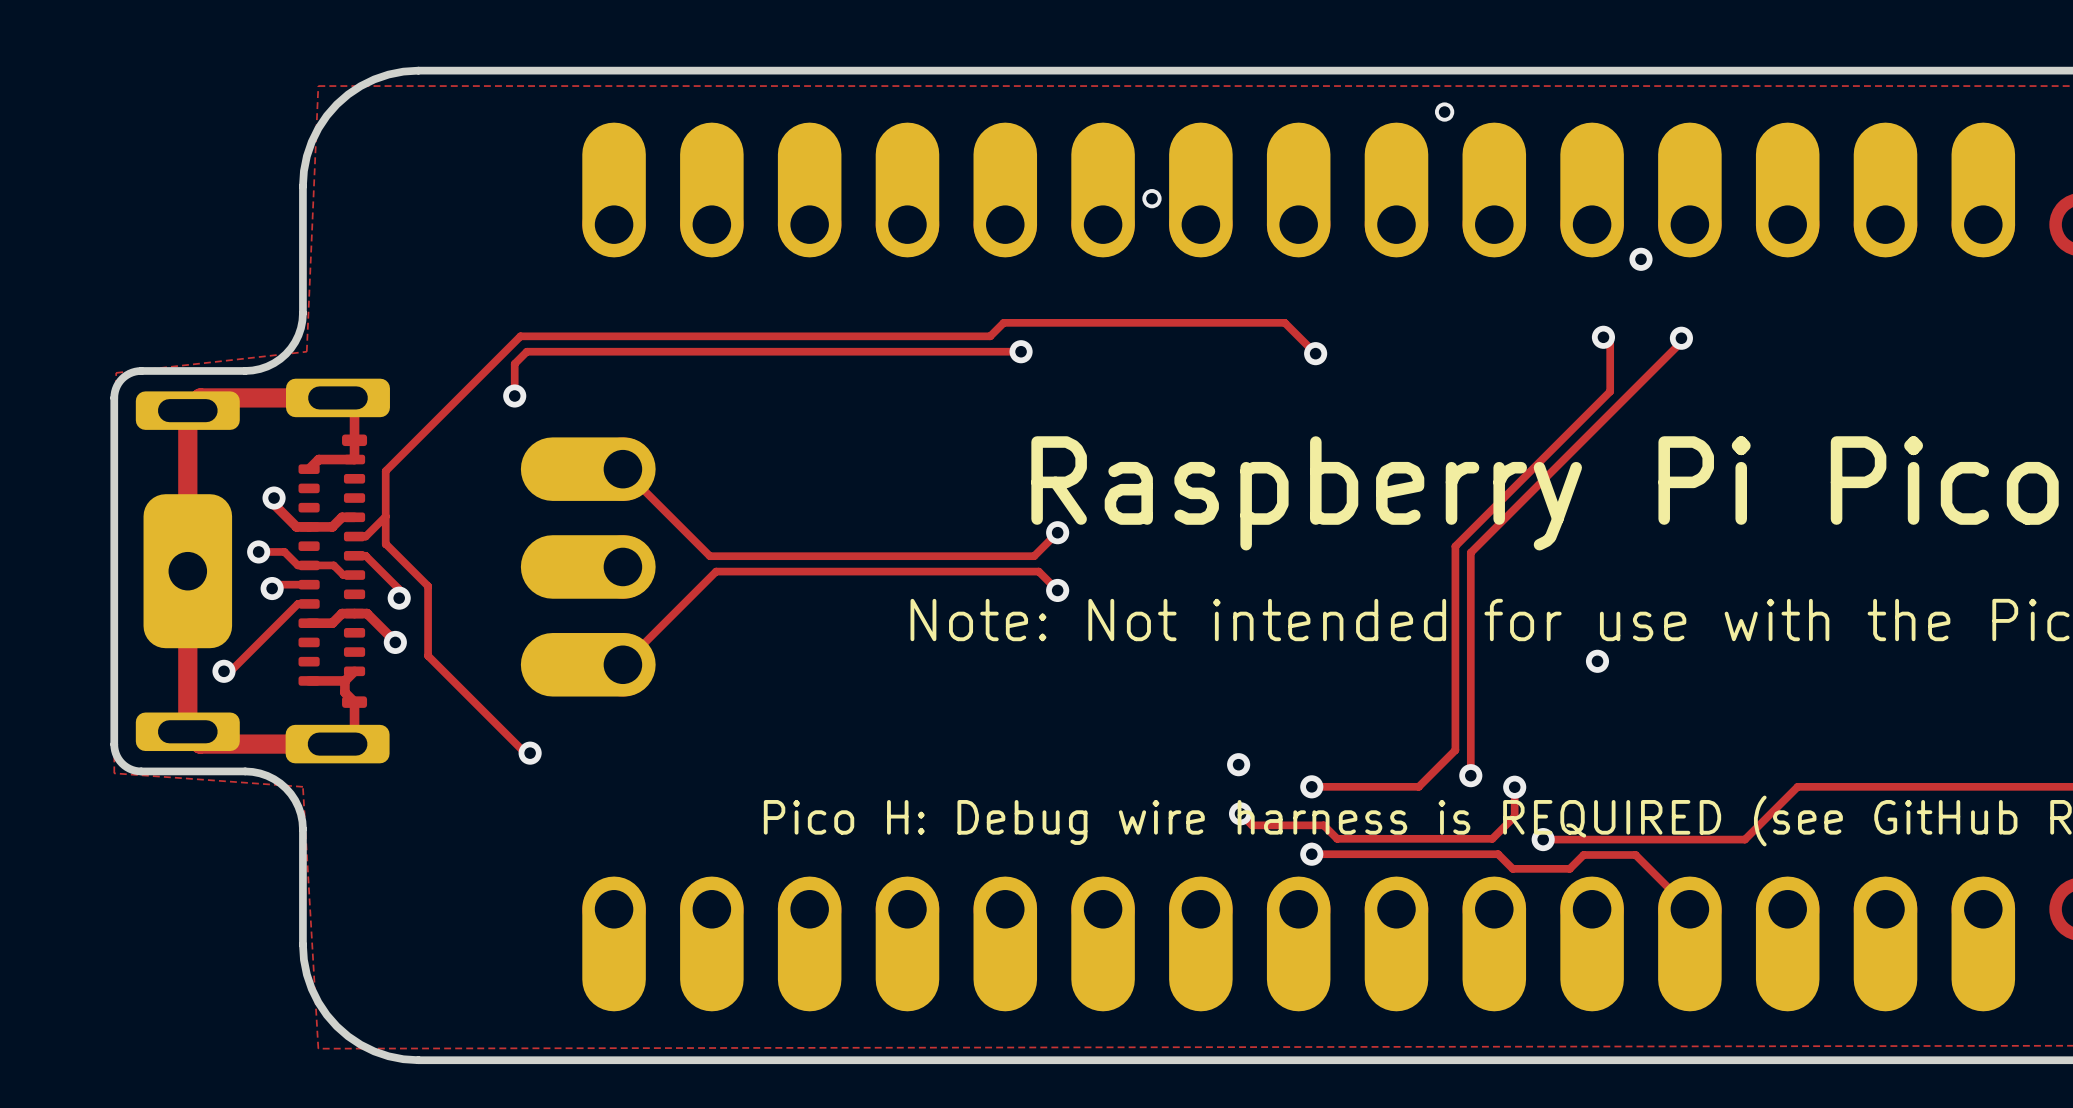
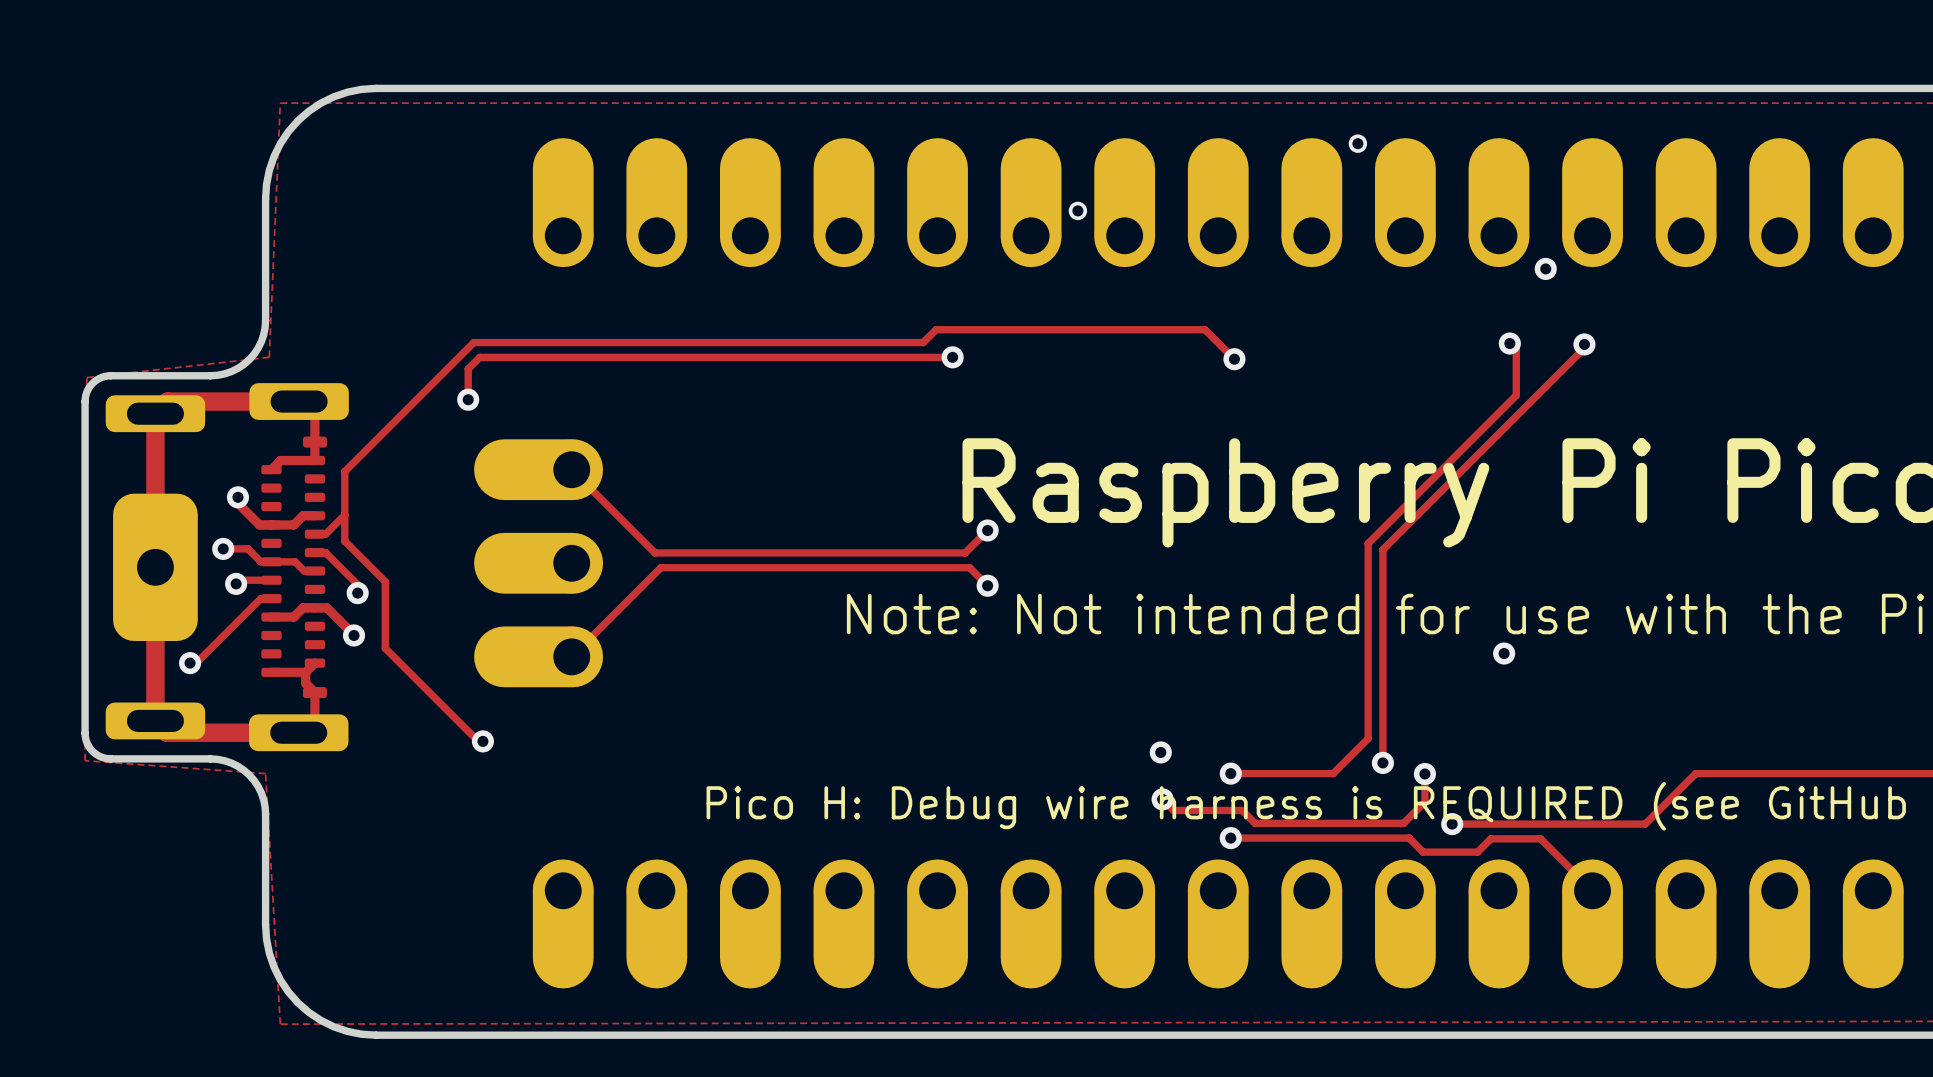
via position: (1444, 112) -> (1357, 143)

